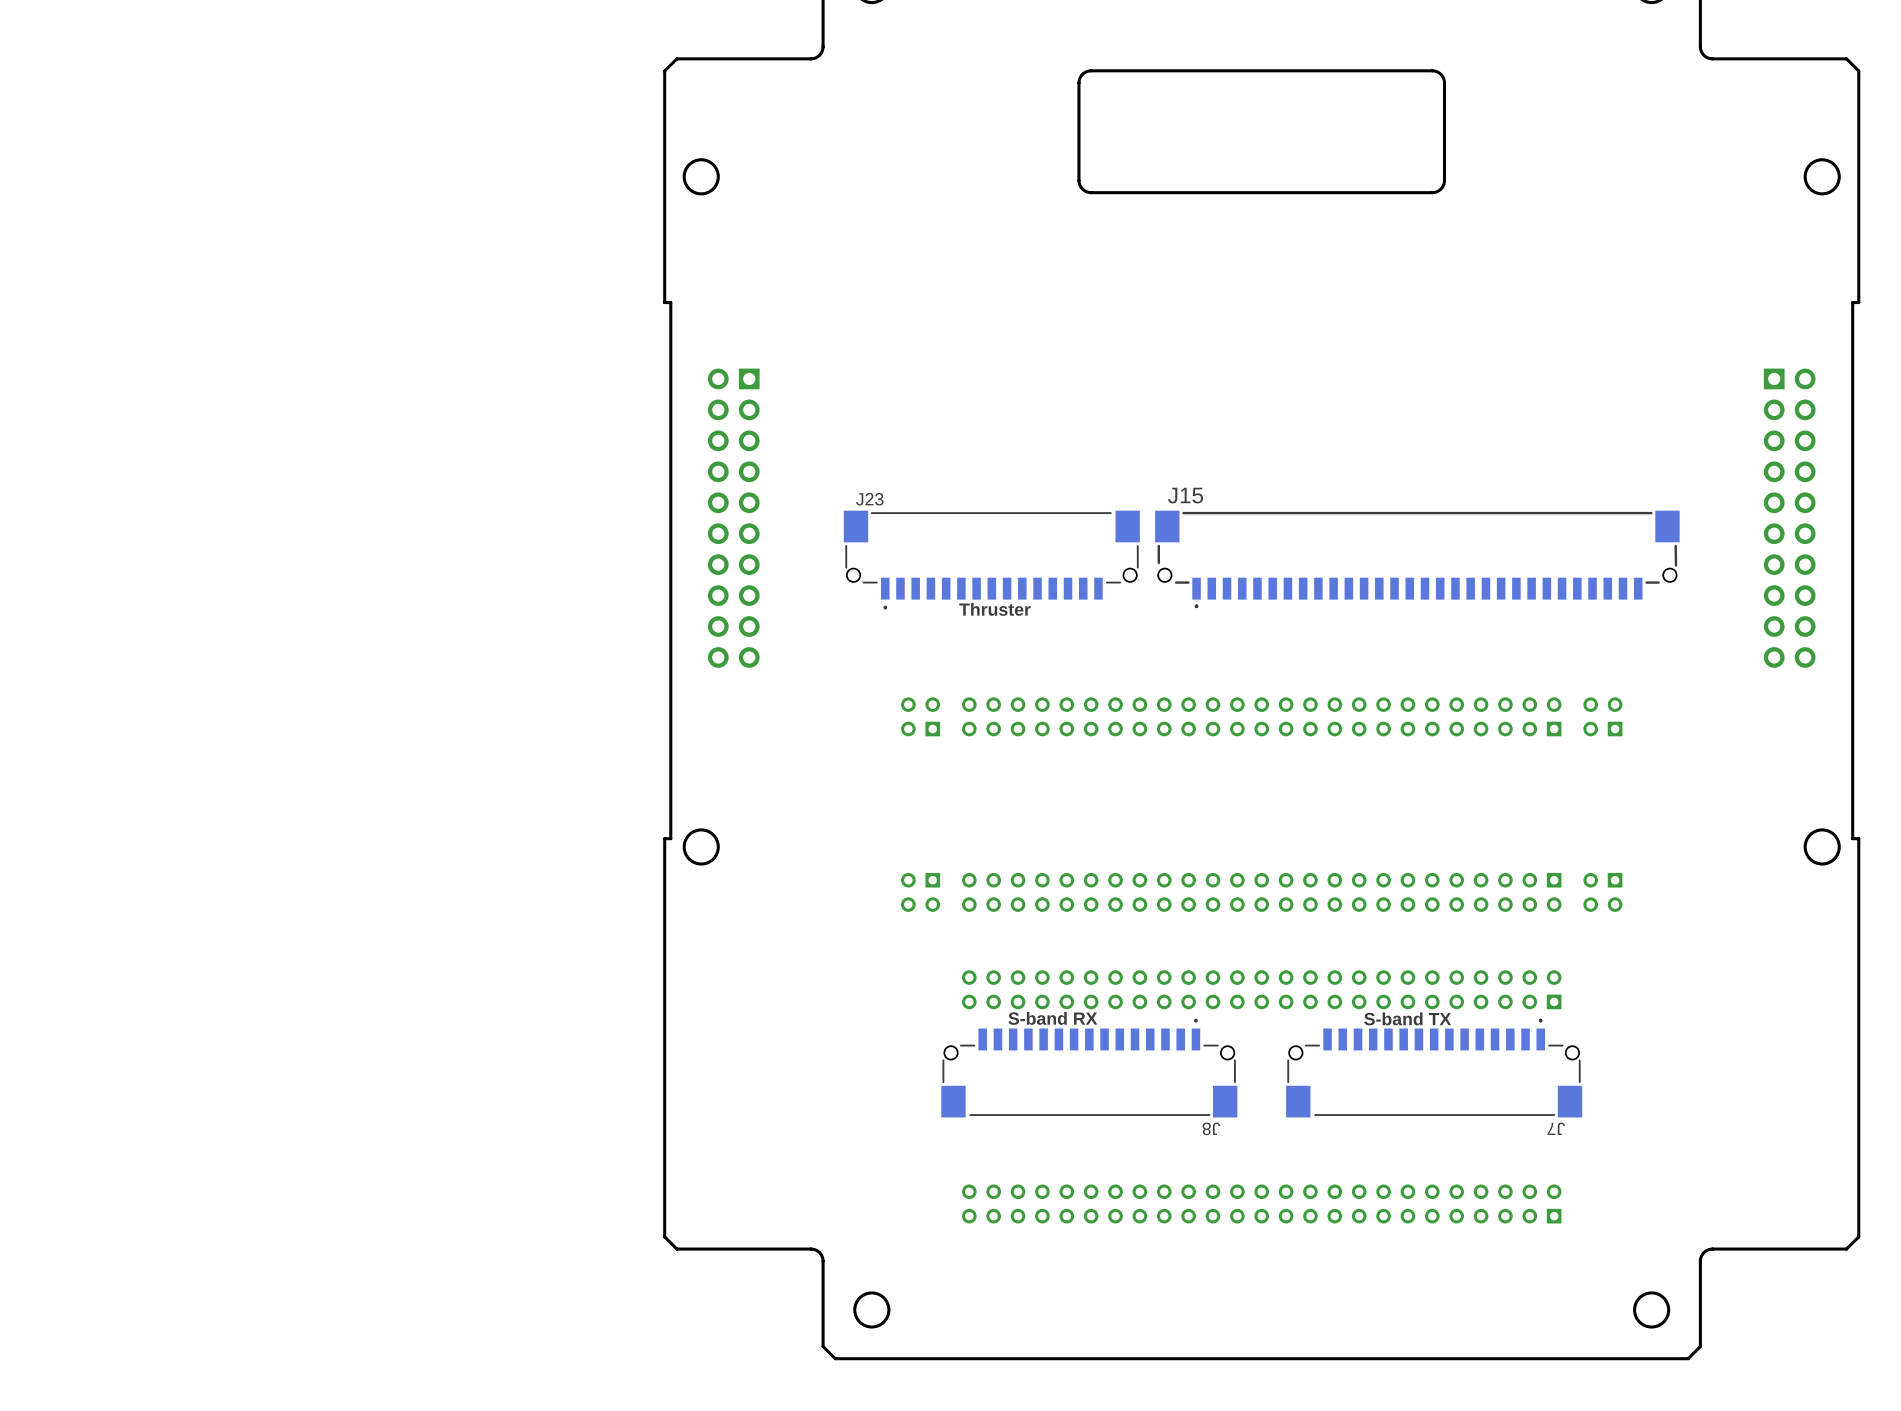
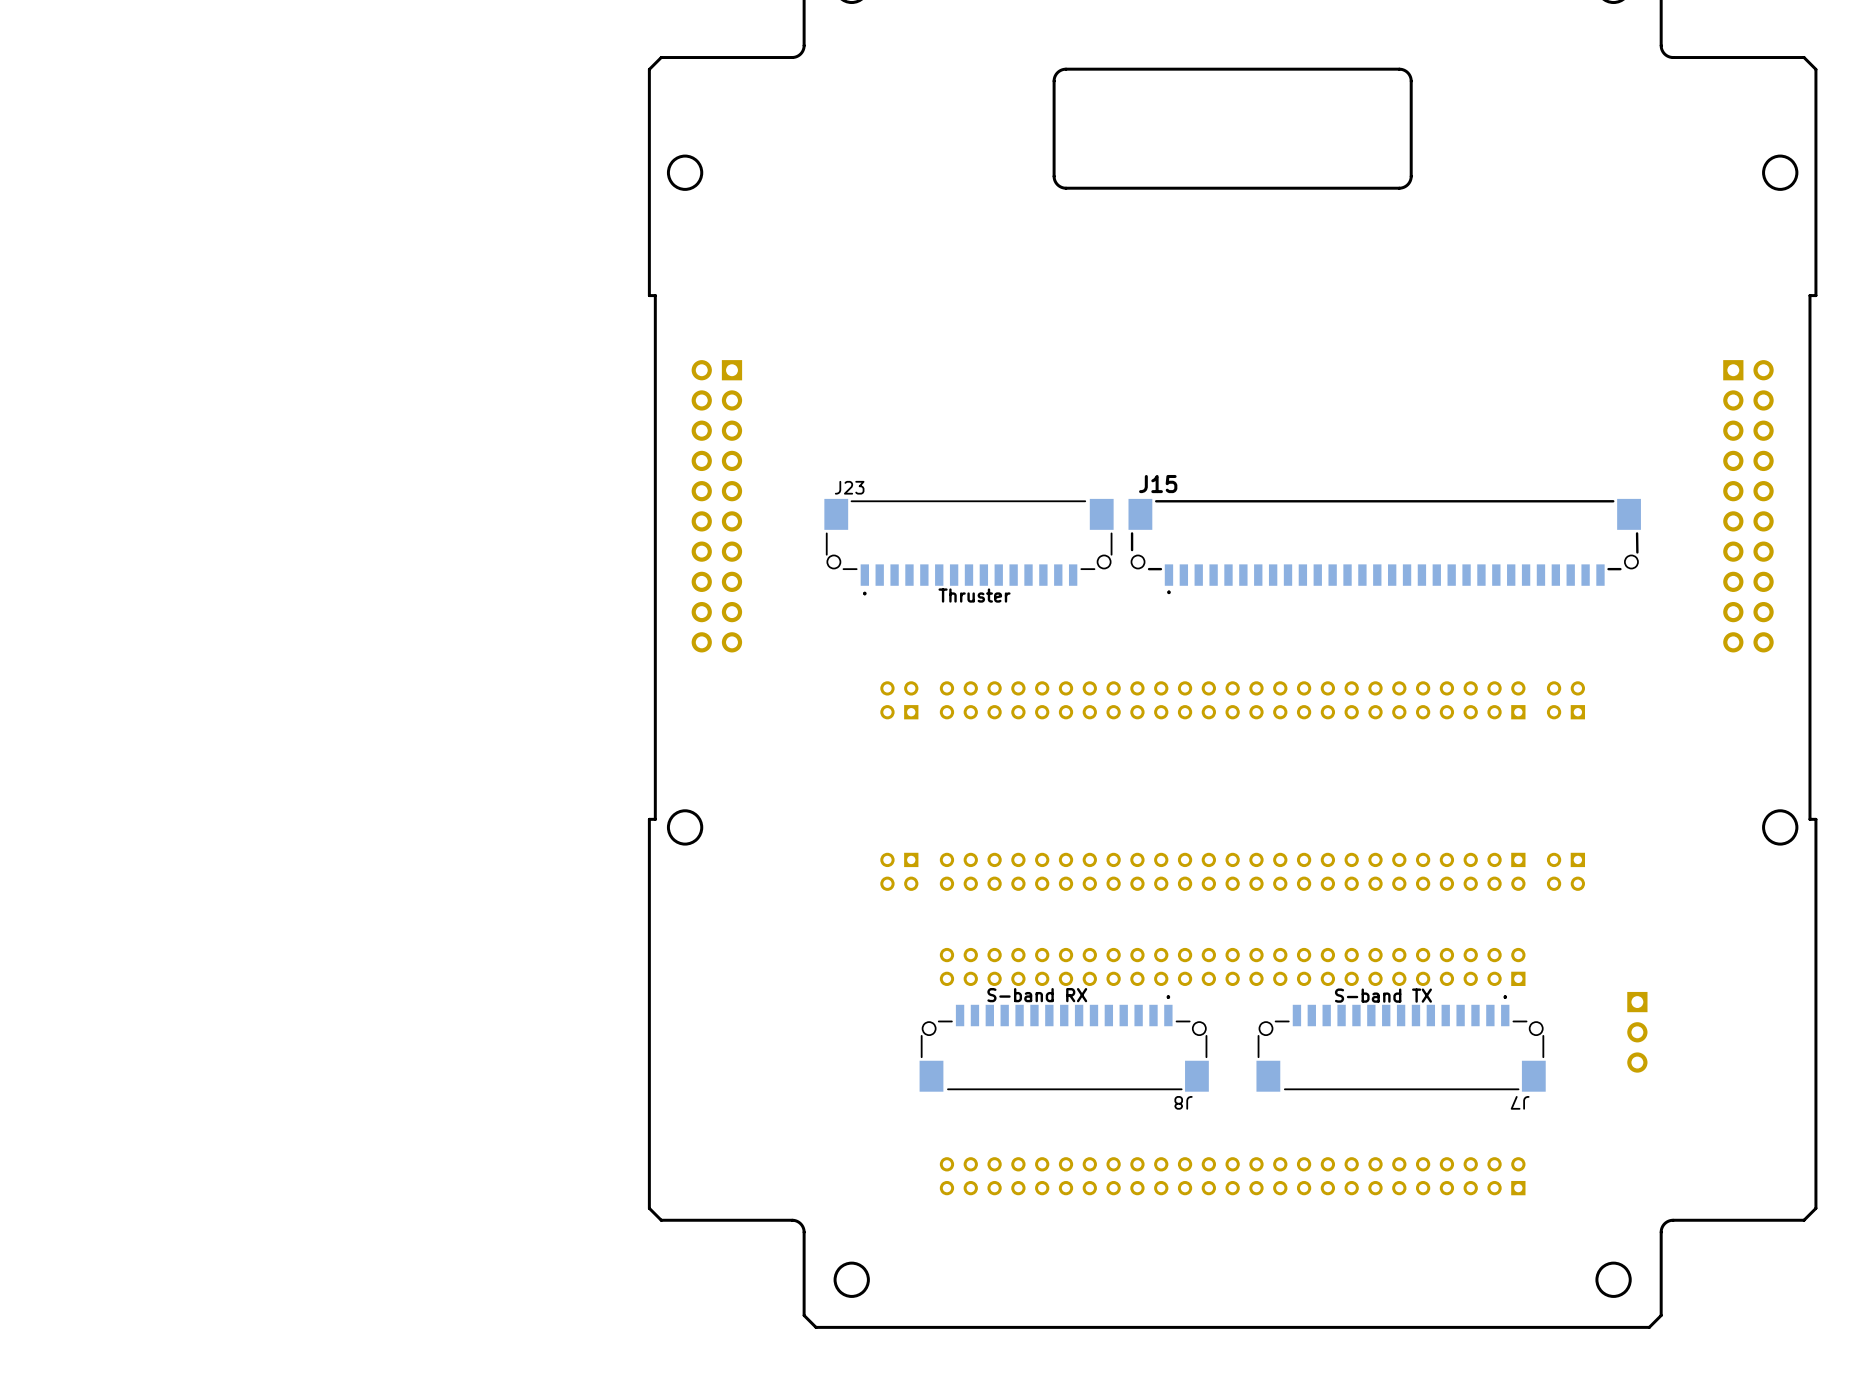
part: none -> (1637, 1032)

